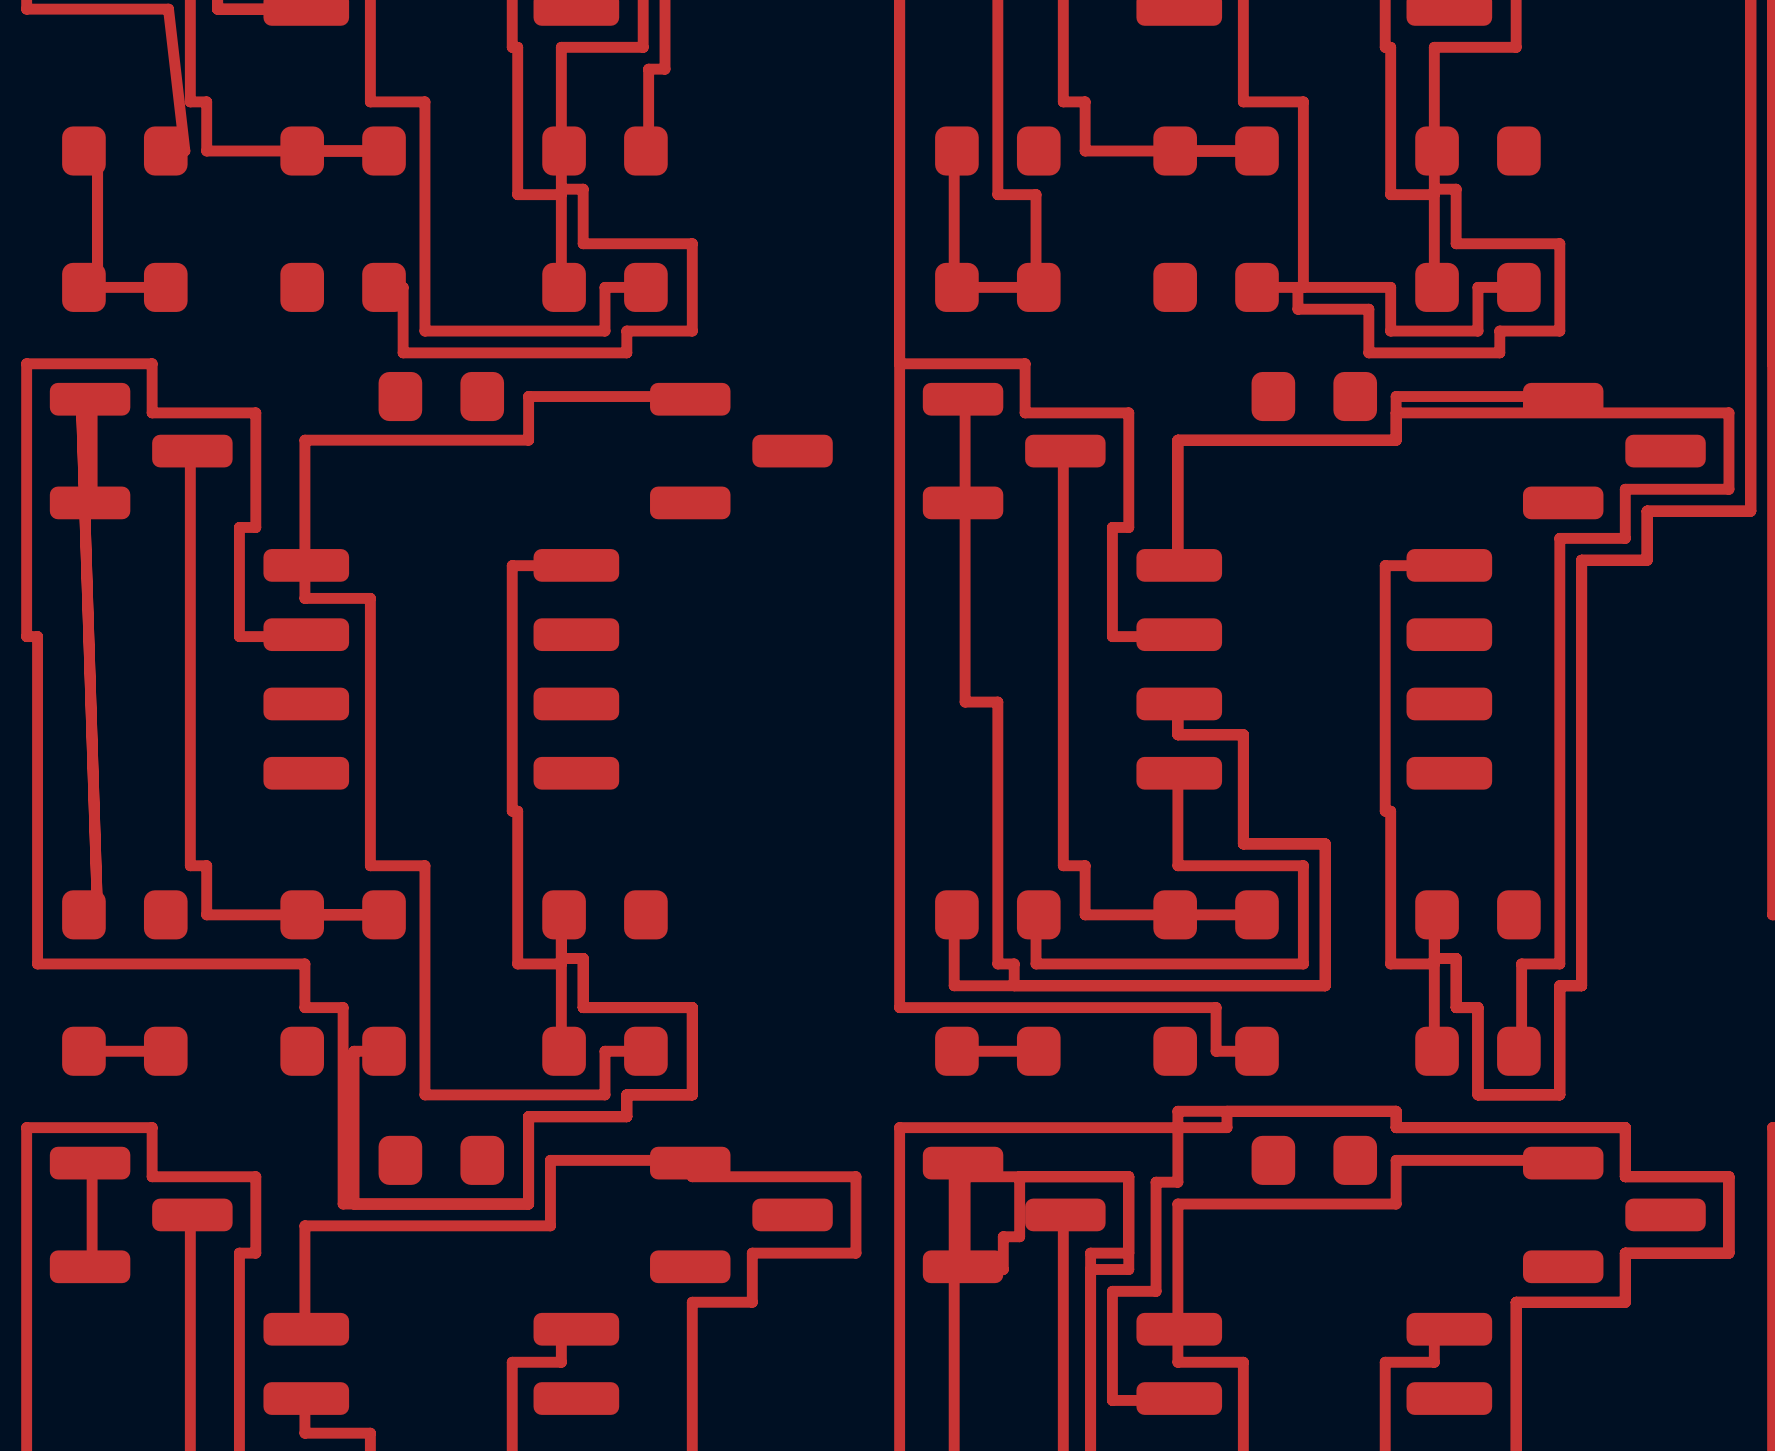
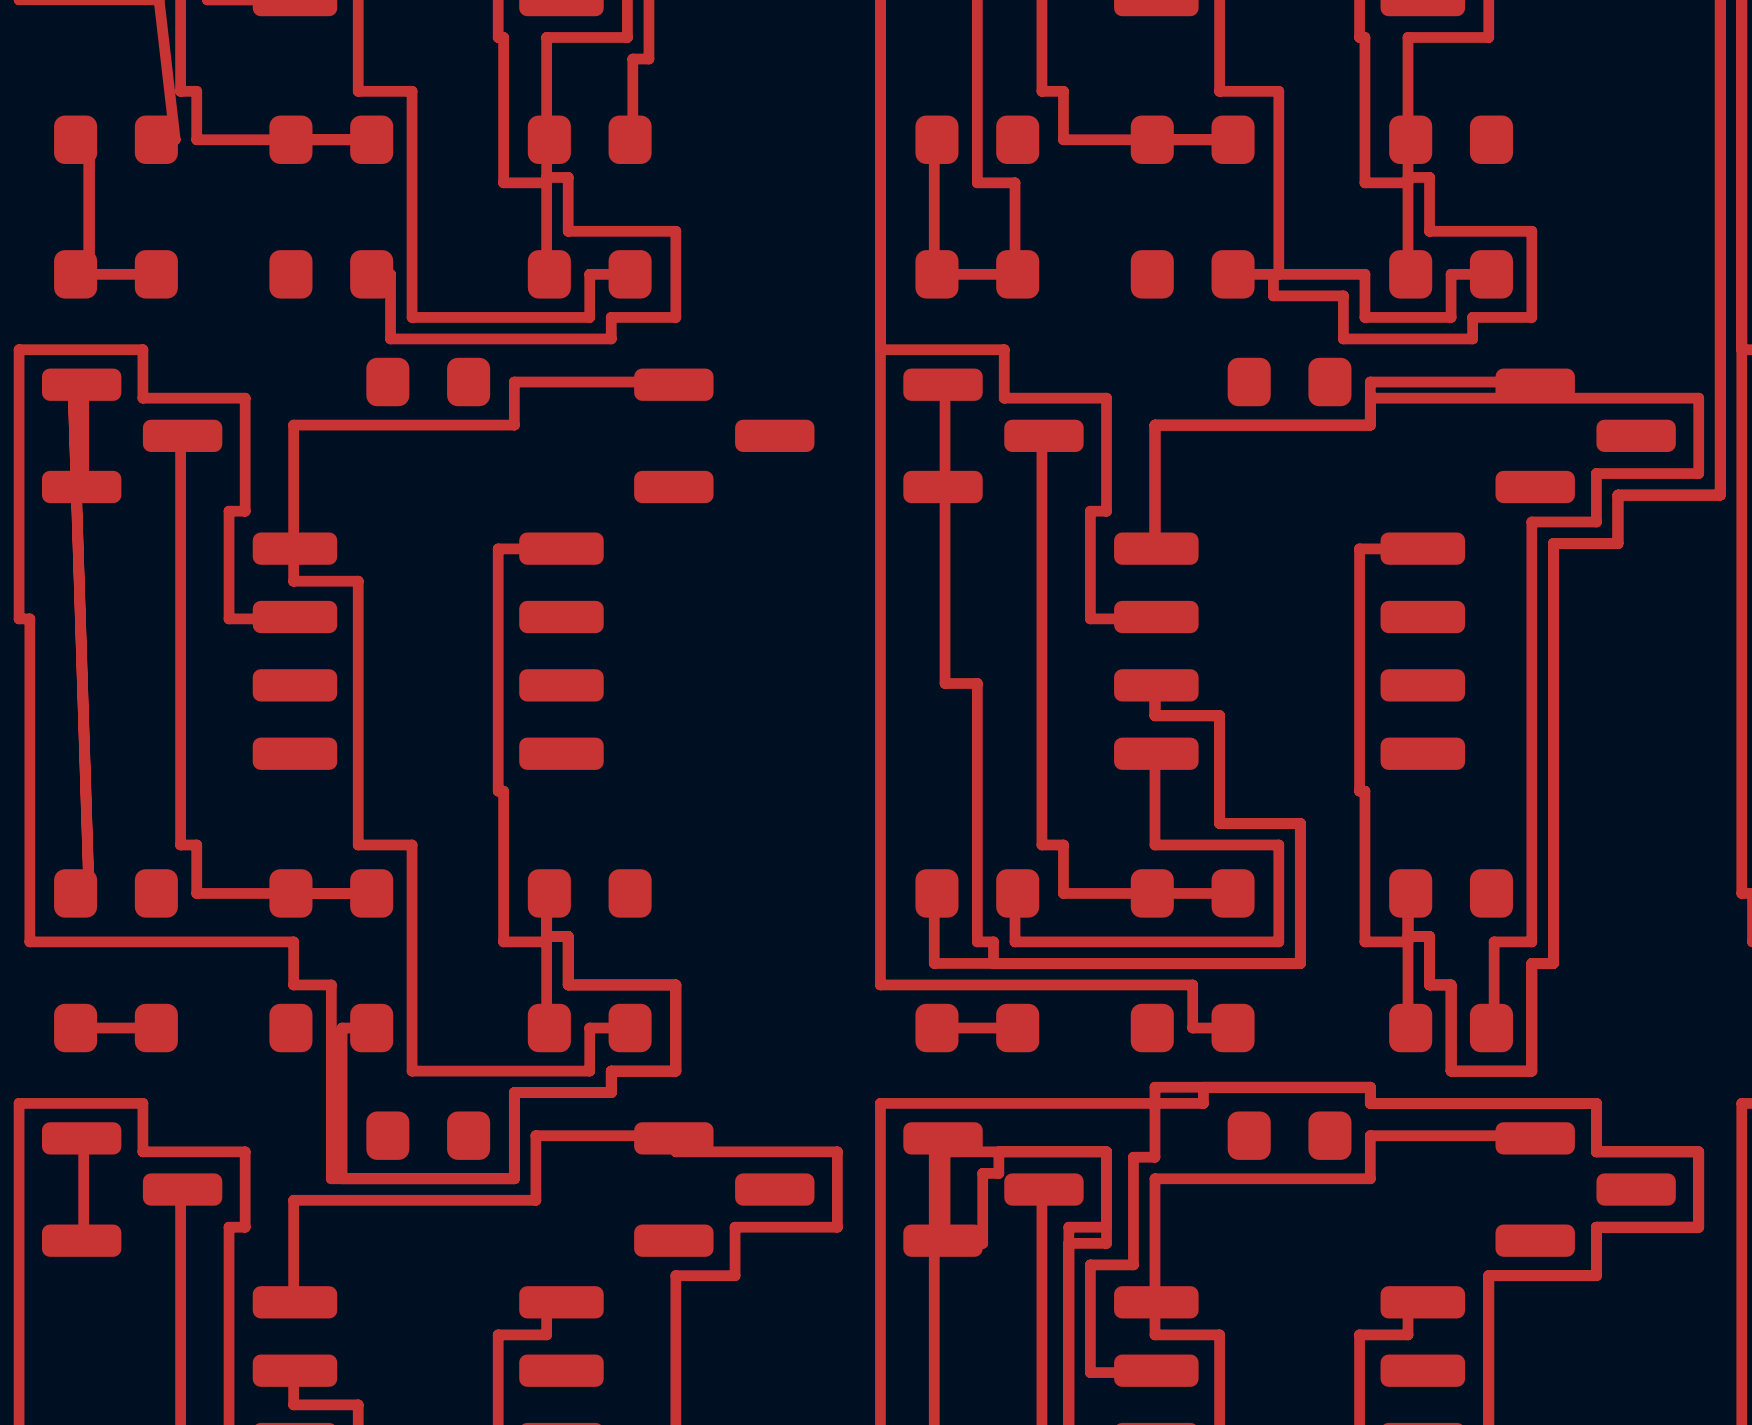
track: (1019, 1198) (1019, 1236) (1003, 1236) -> (998, 1173) (982, 1173) (982, 1211)

